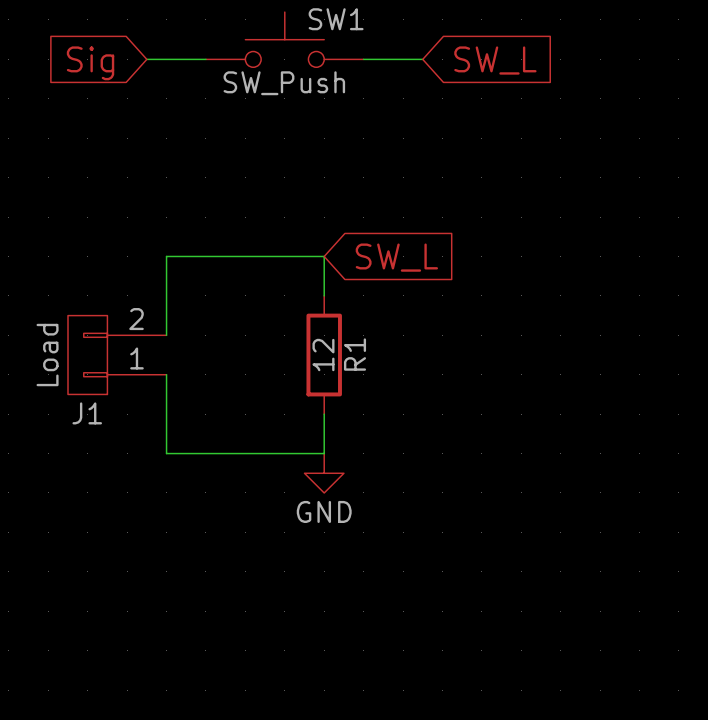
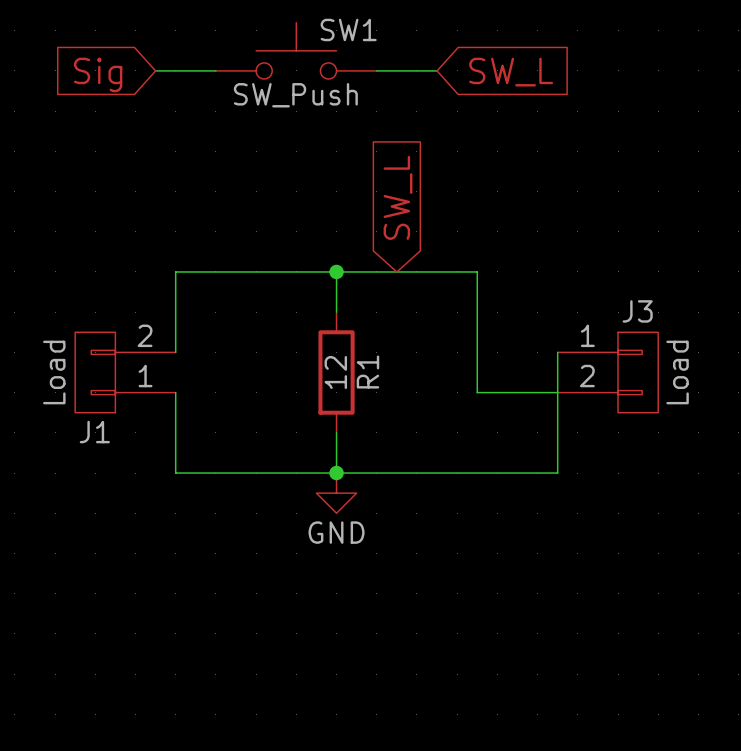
wire: none -> (336, 271) (477, 271) (477, 392) (557, 392)
junction: none -> (336, 271)
global label rotation: 0° (396, 257) -> 90° counterclockwise (398, 197)
wire: none -> (557, 352) (557, 473) (336, 473)
J3: none -> Load (607, 372)
junction: none -> (336, 473)

